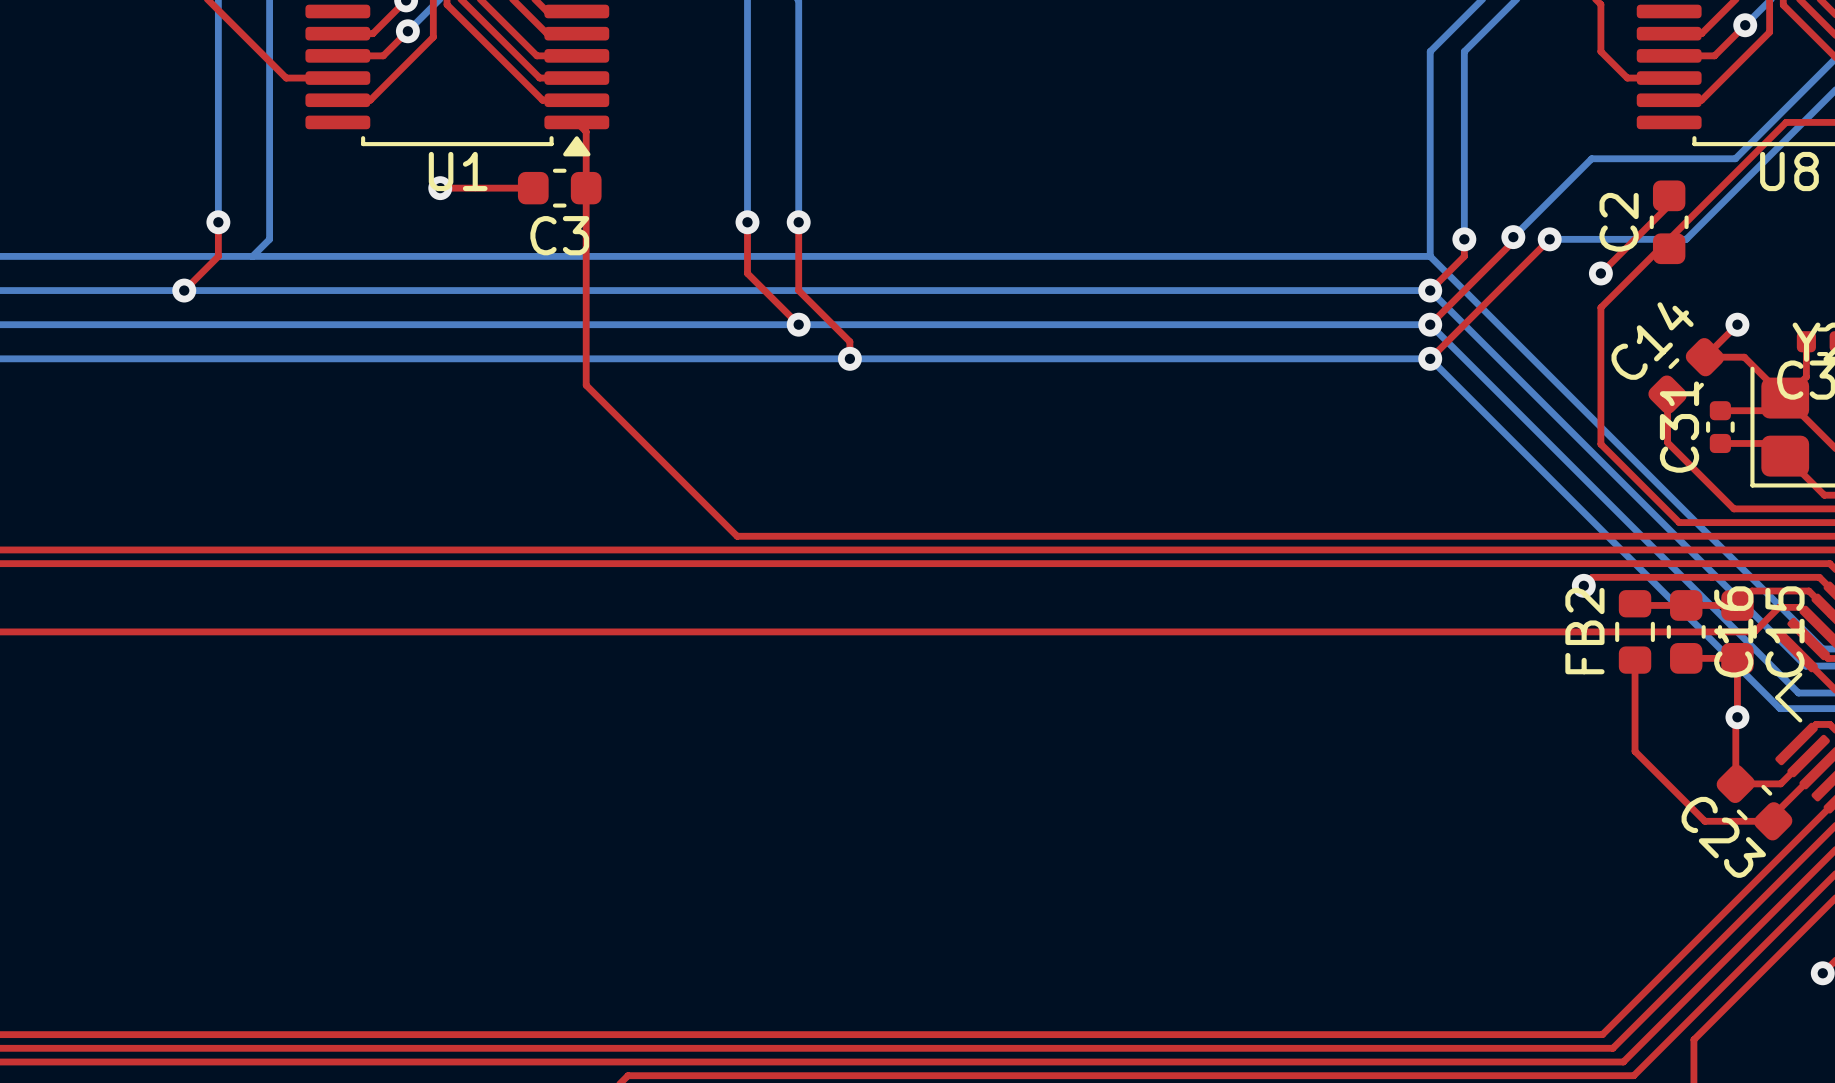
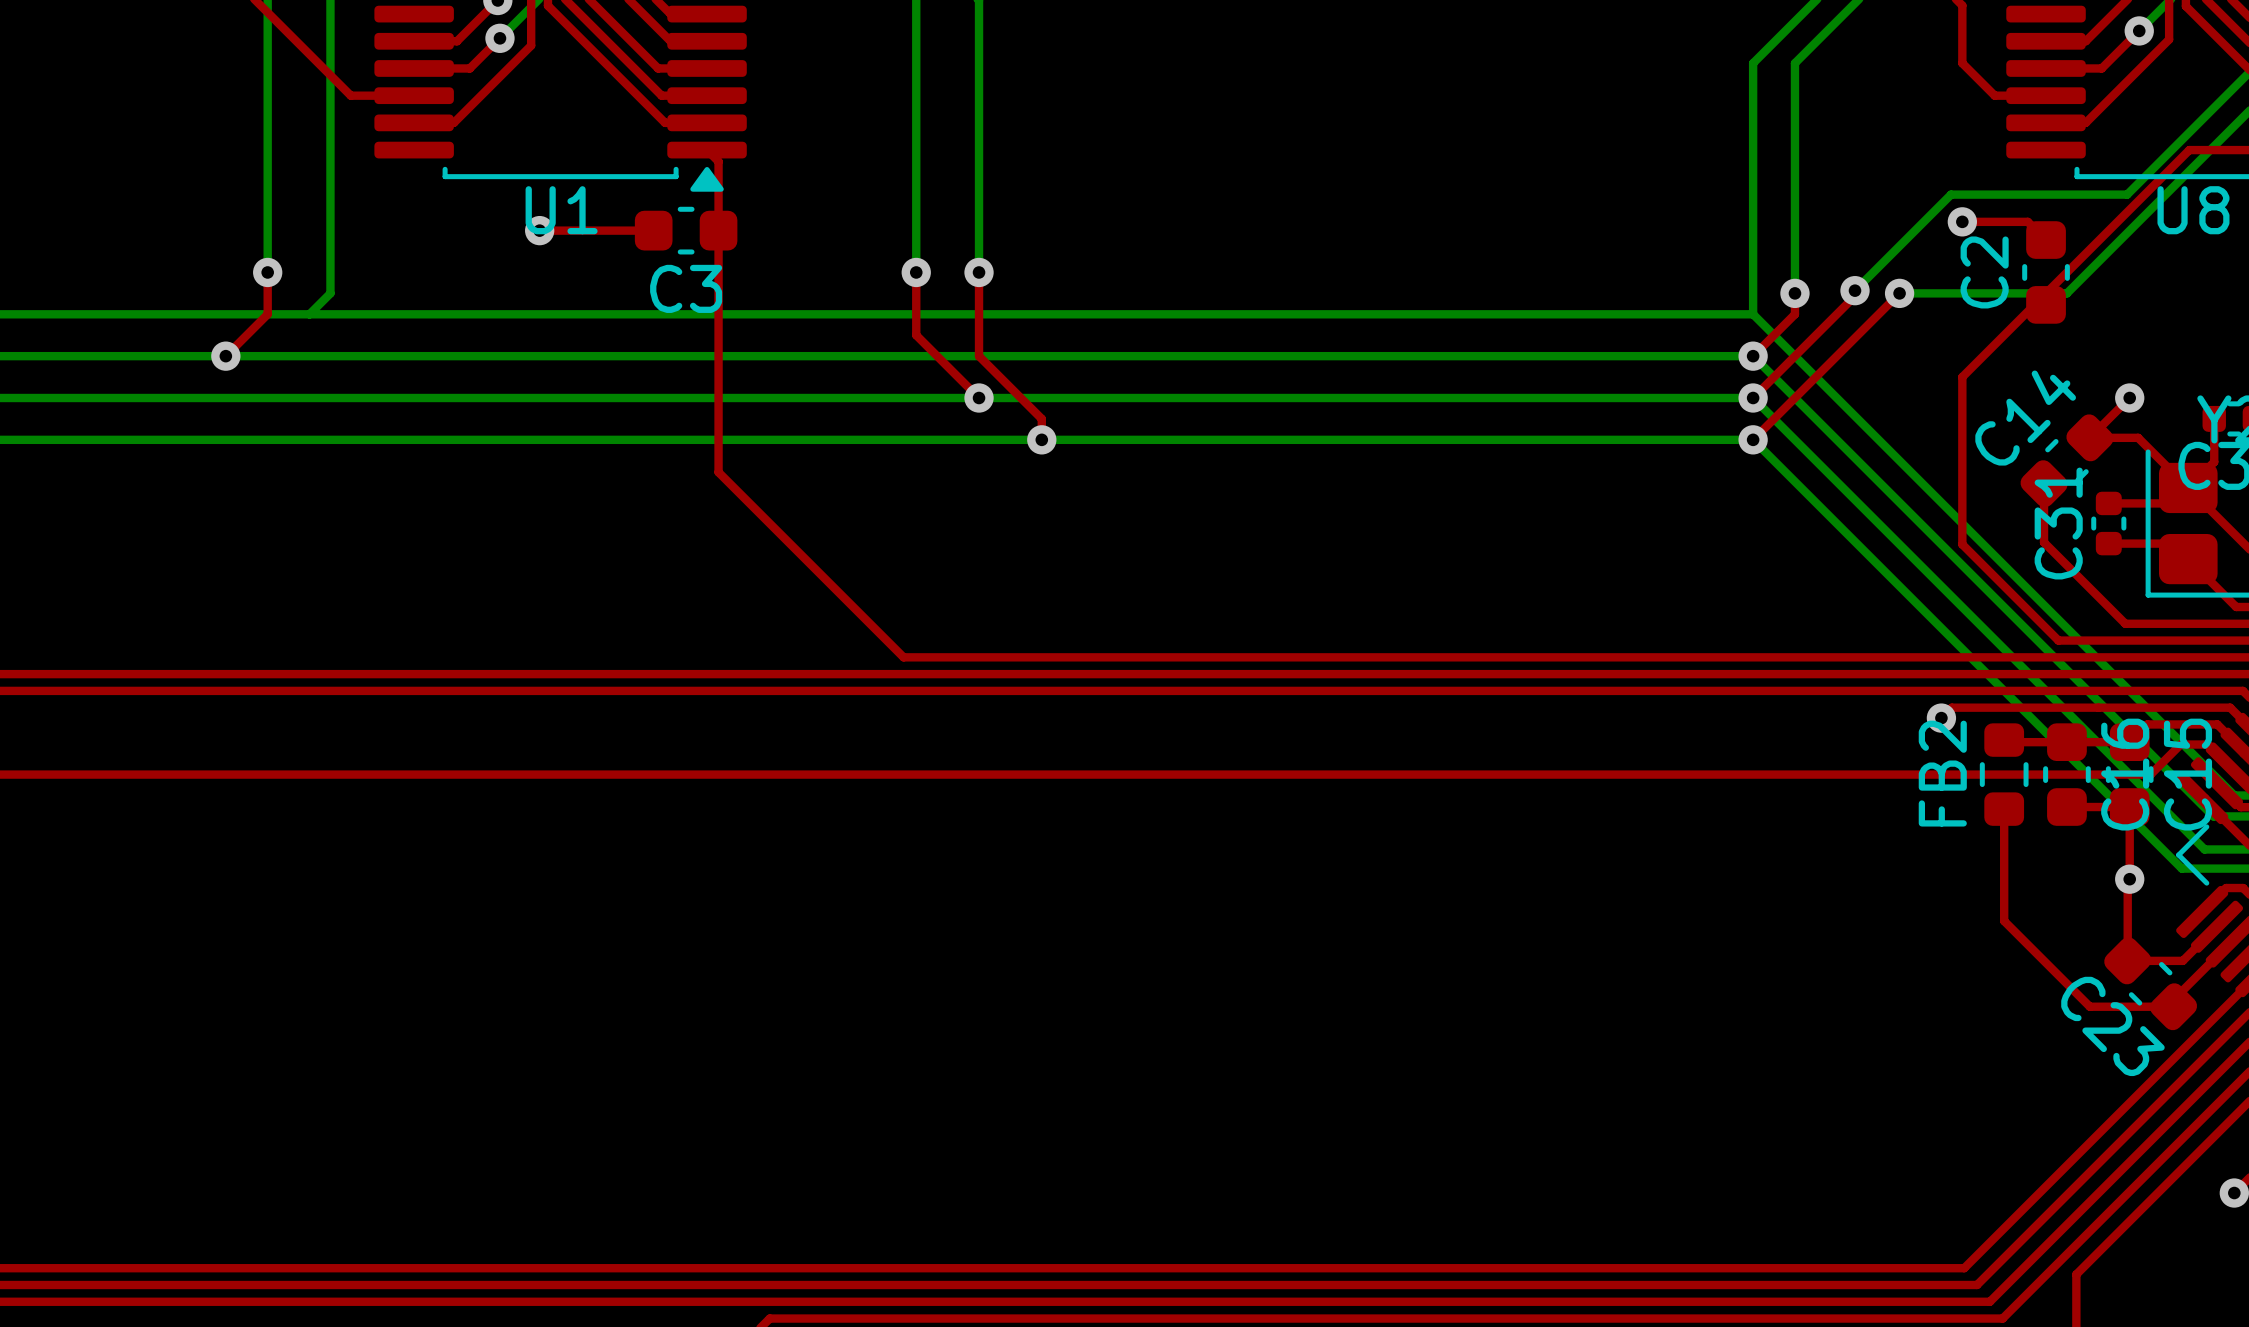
top track: (1669, 195) (1669, 205) (1600, 273) -> (2046, 240) (2027, 221) (1962, 221)
via position: (1600, 273) -> (1962, 221)

